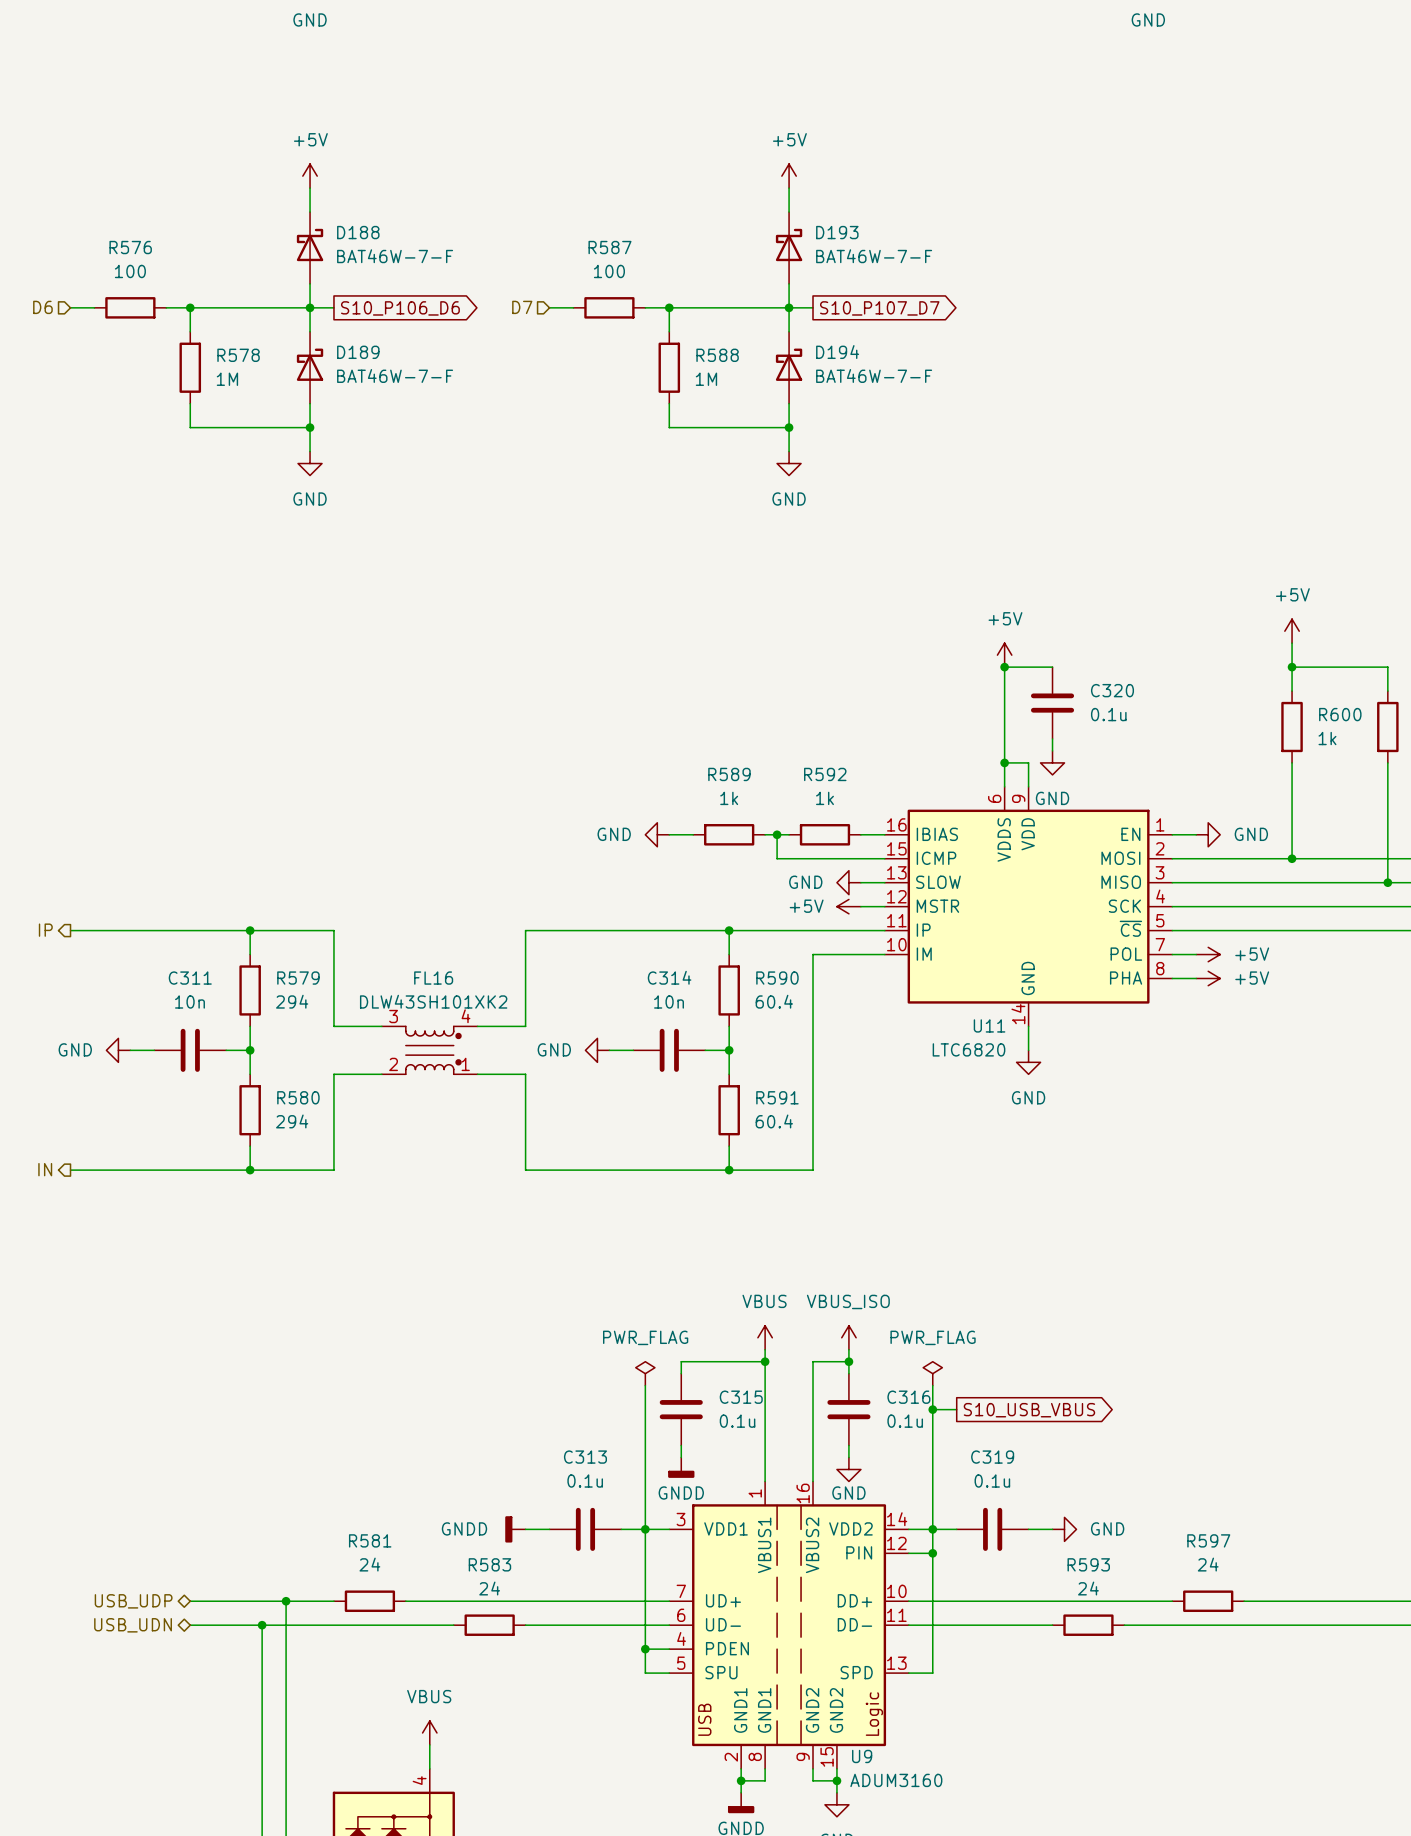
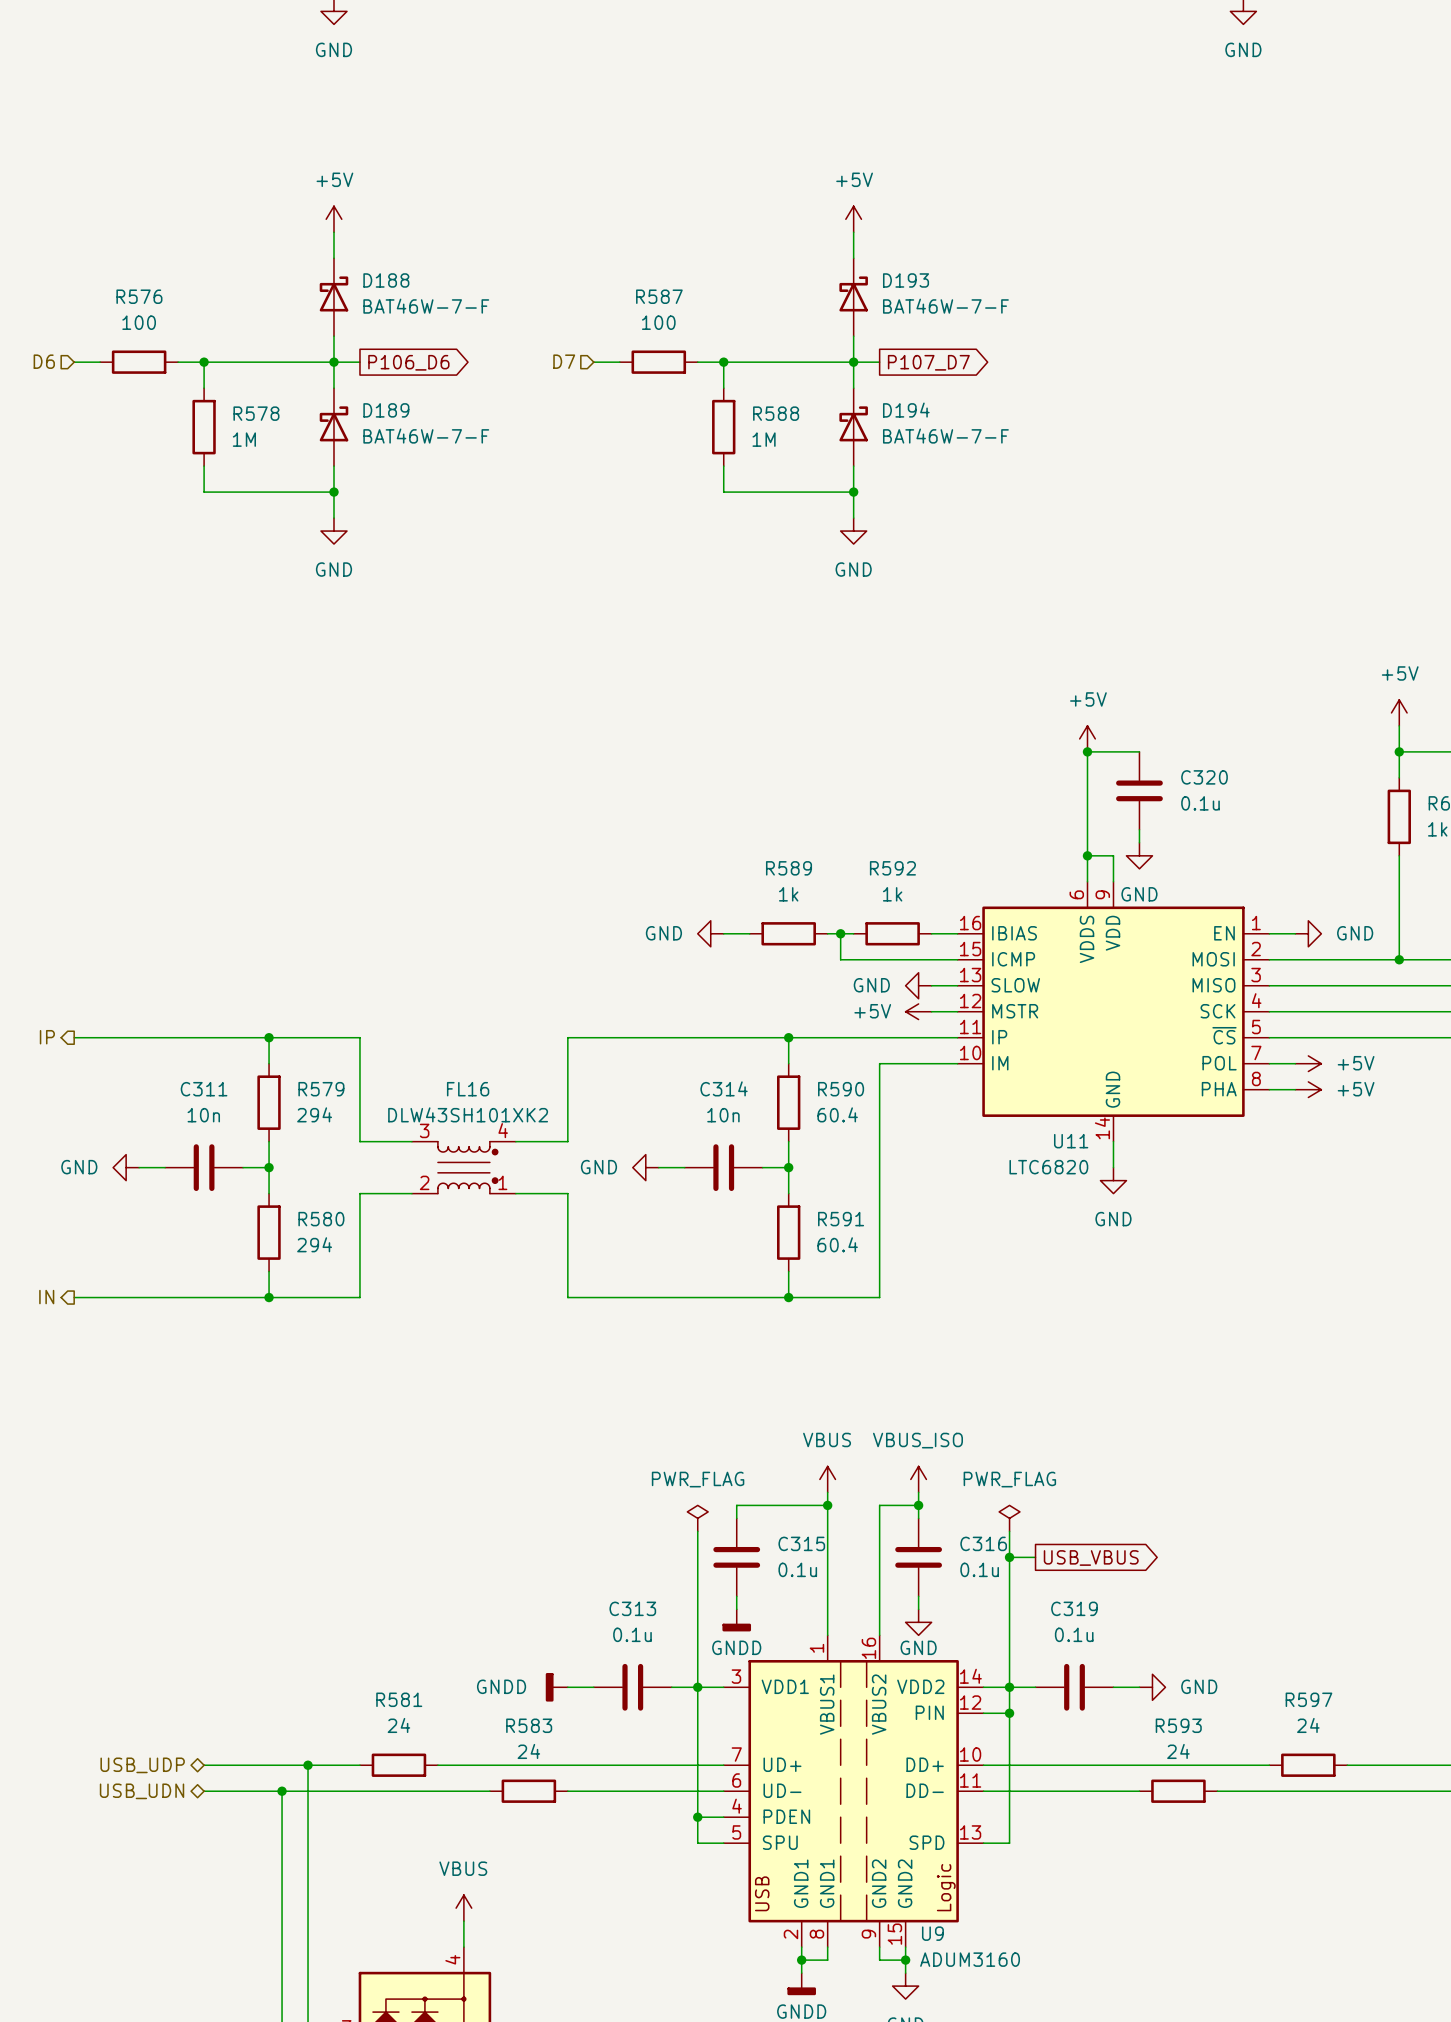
global label: S10_P106_D6 (400, 308) -> P106_D6 (408, 362)
global label: S10_P107_D7 (879, 308) -> P107_D7 (928, 362)
global label: S10_USB_VBUS (1029, 1410) -> USB_VBUS (1091, 1557)

